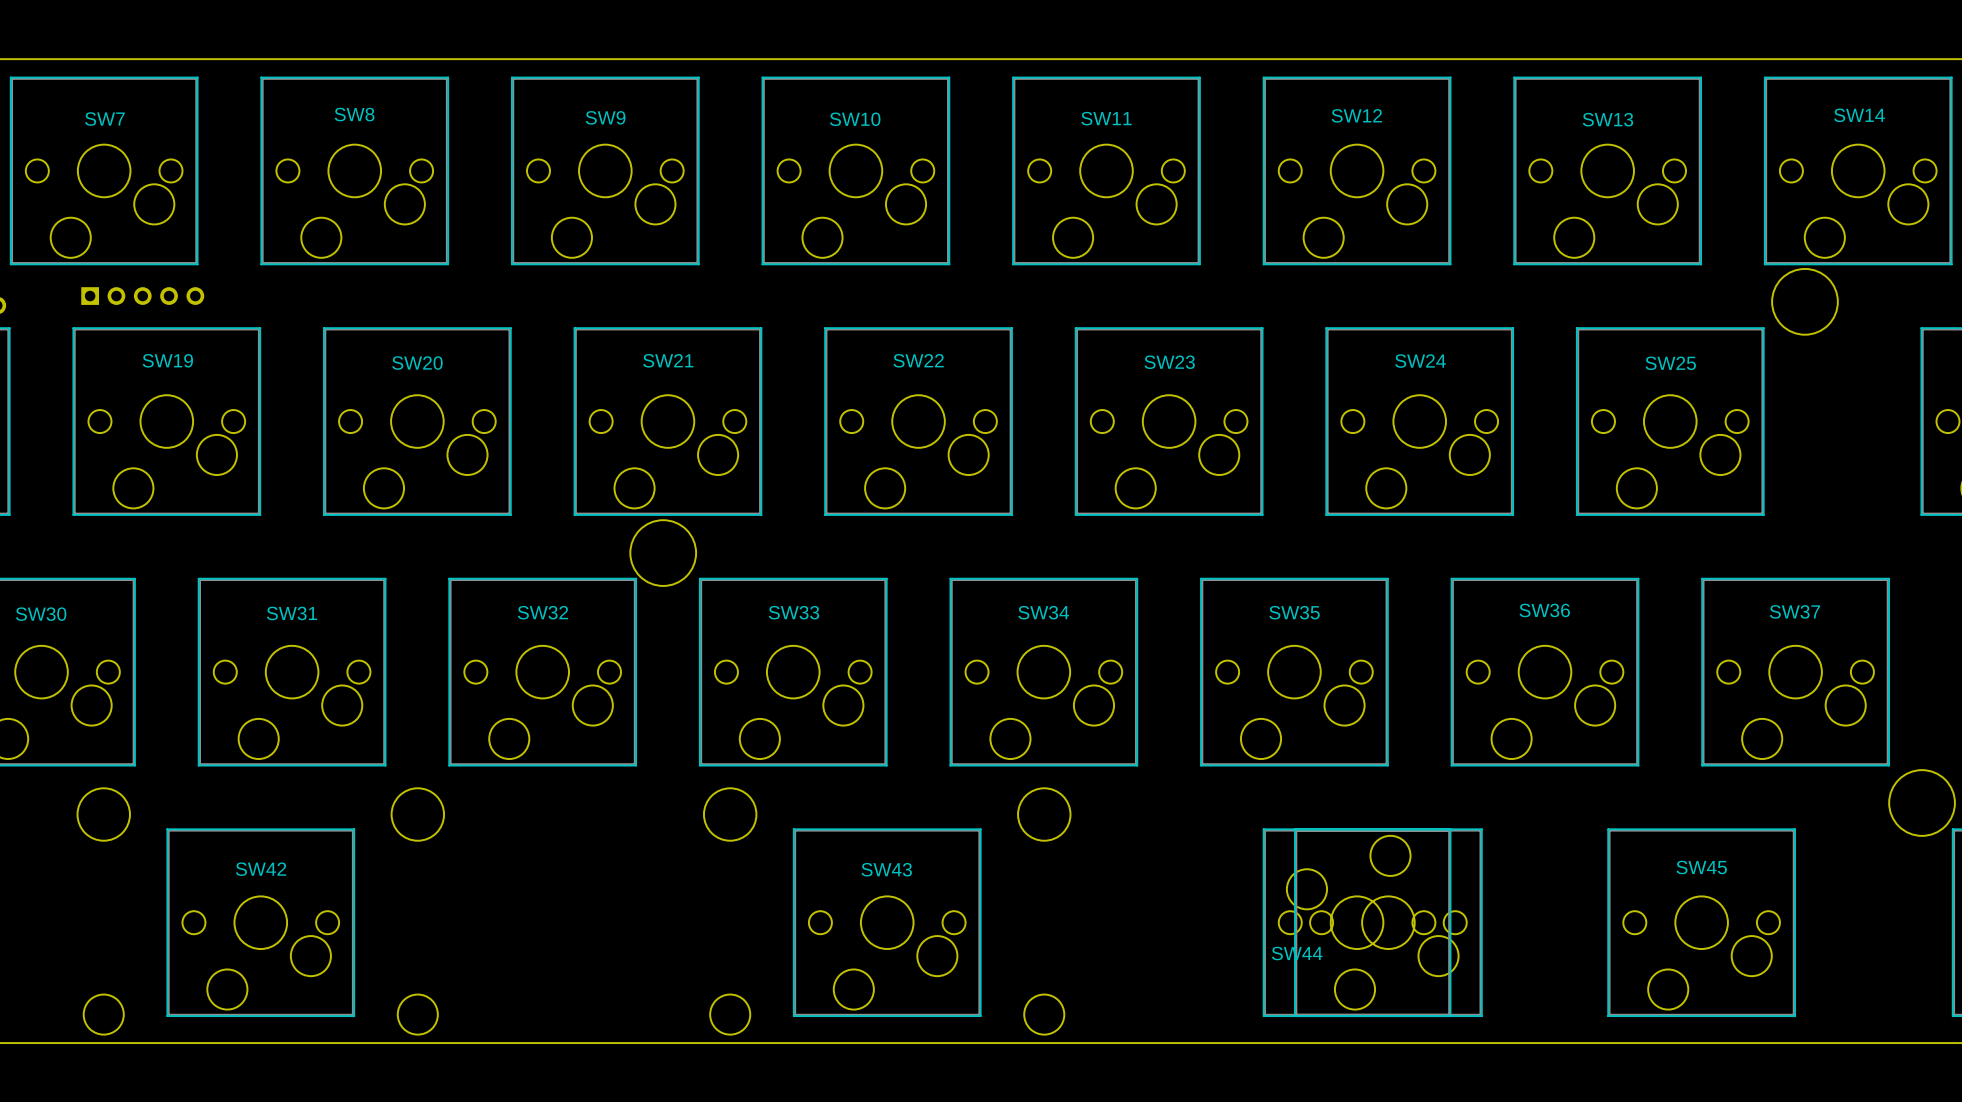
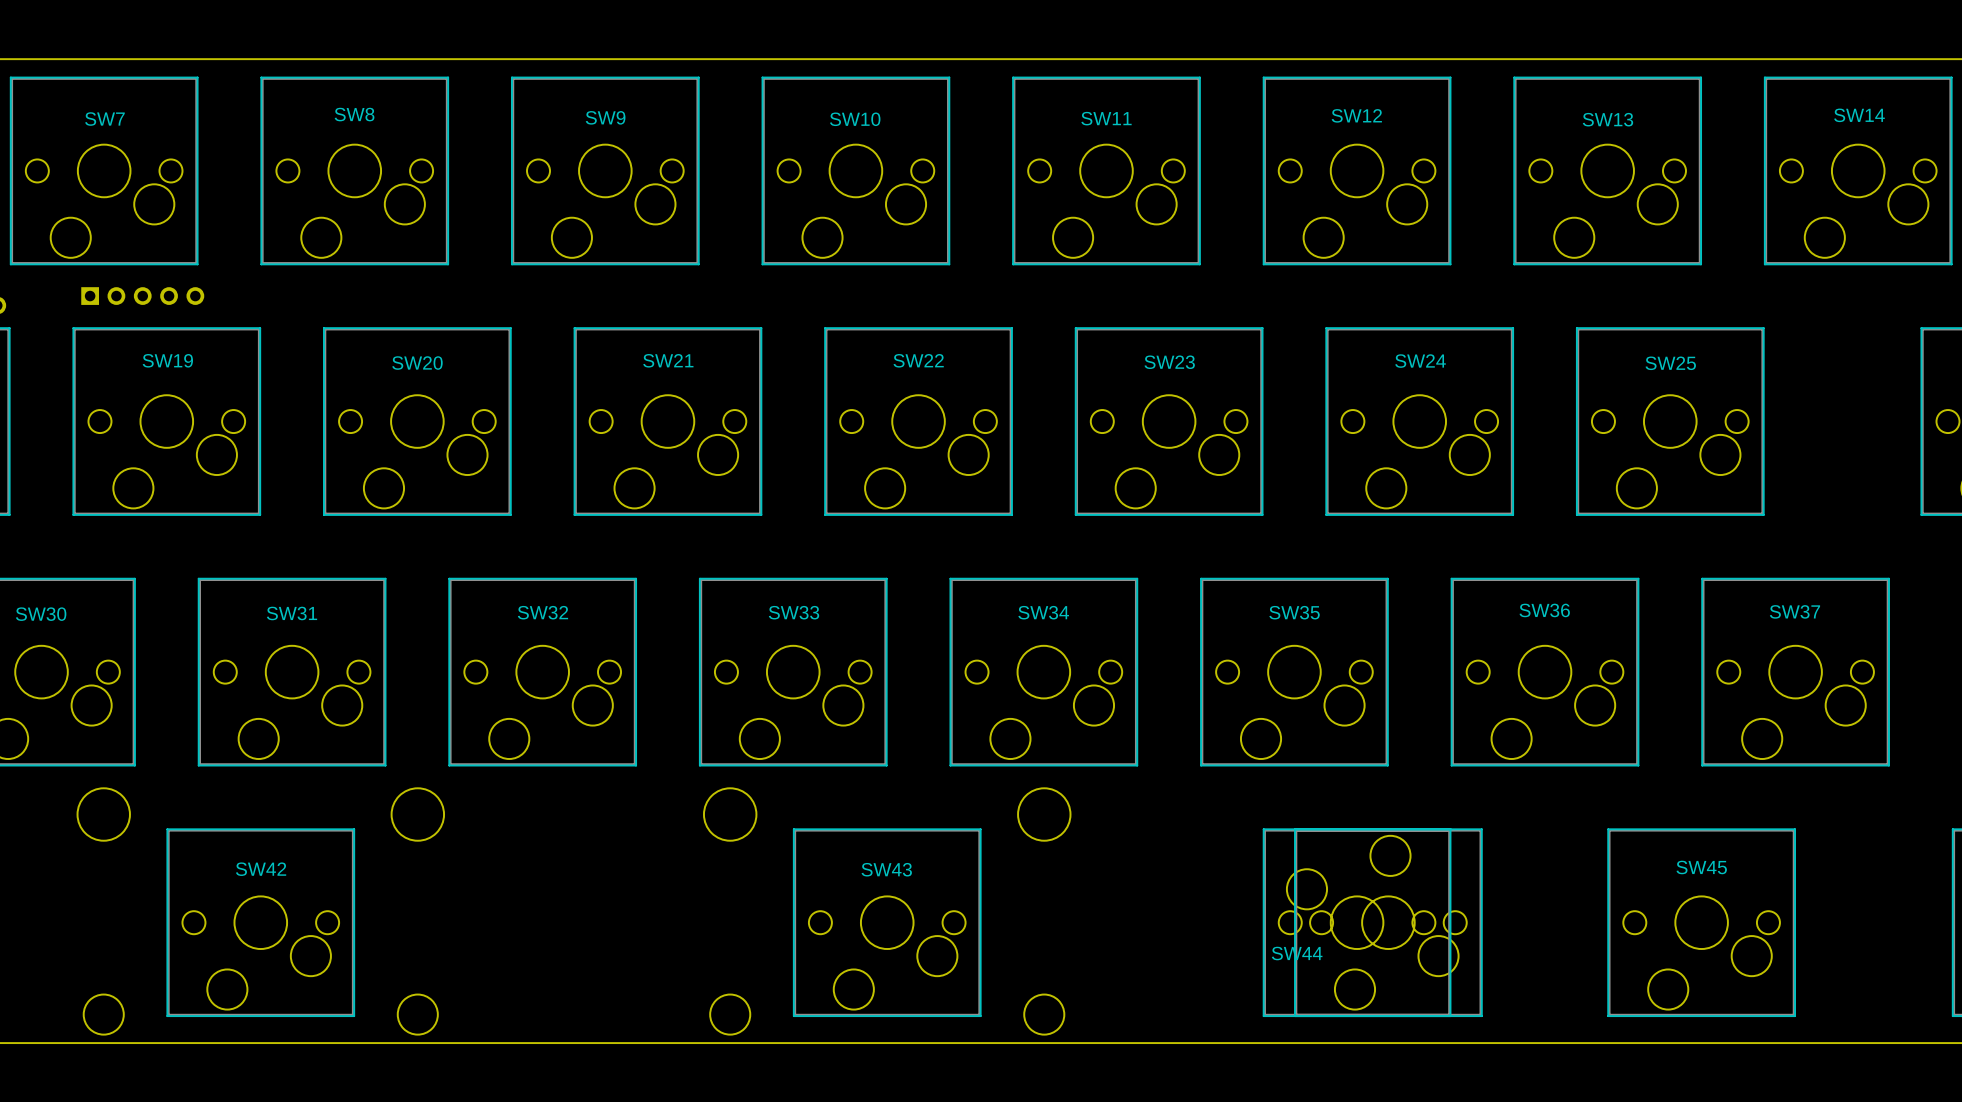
round board edge: [1771, 268, 1839, 336] -> none
round board edge: [629, 519, 697, 587] -> none
round board edge: [1888, 769, 1956, 837] -> none

